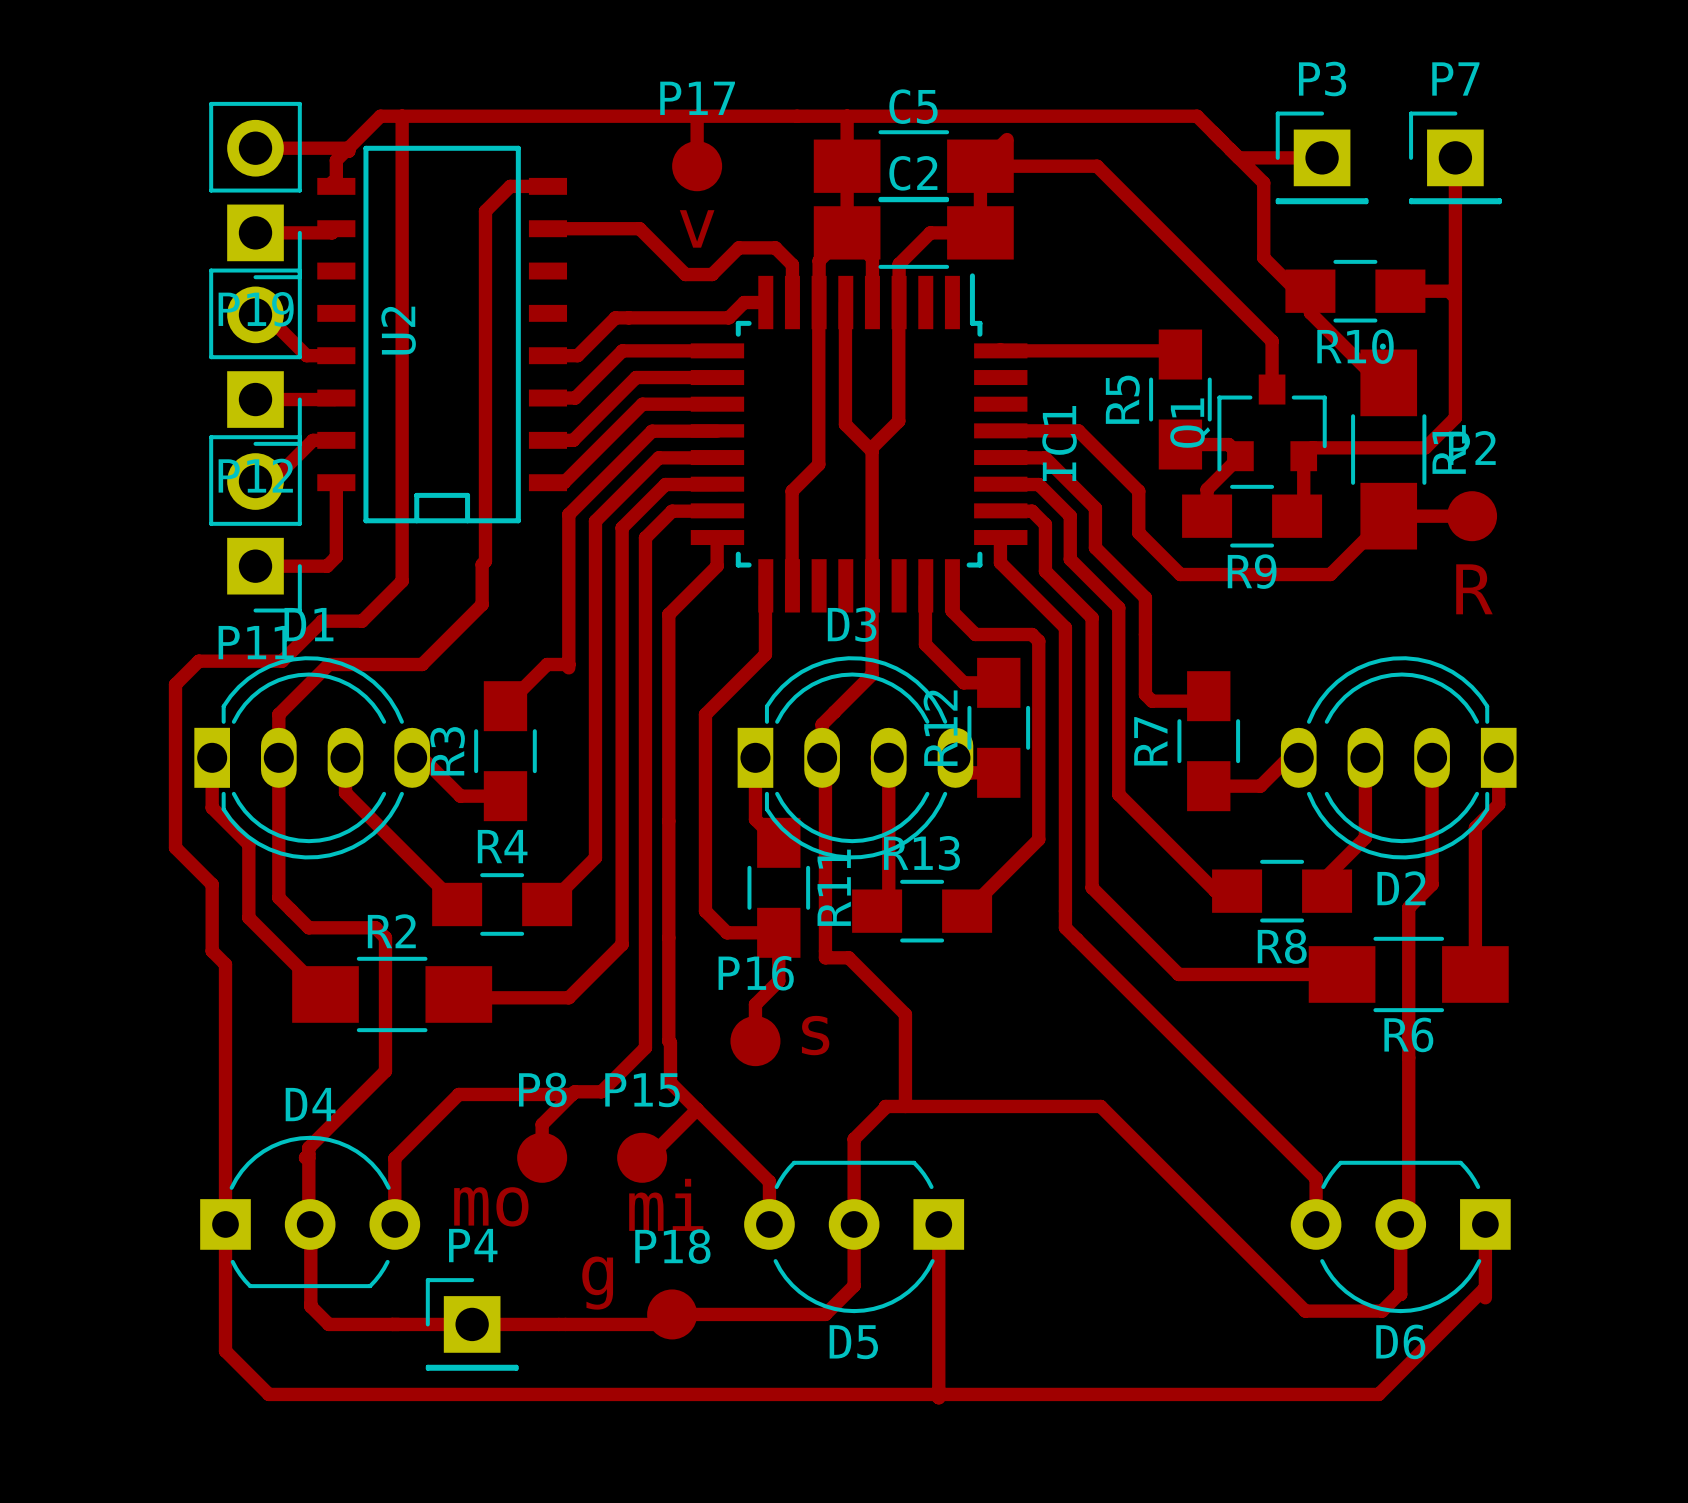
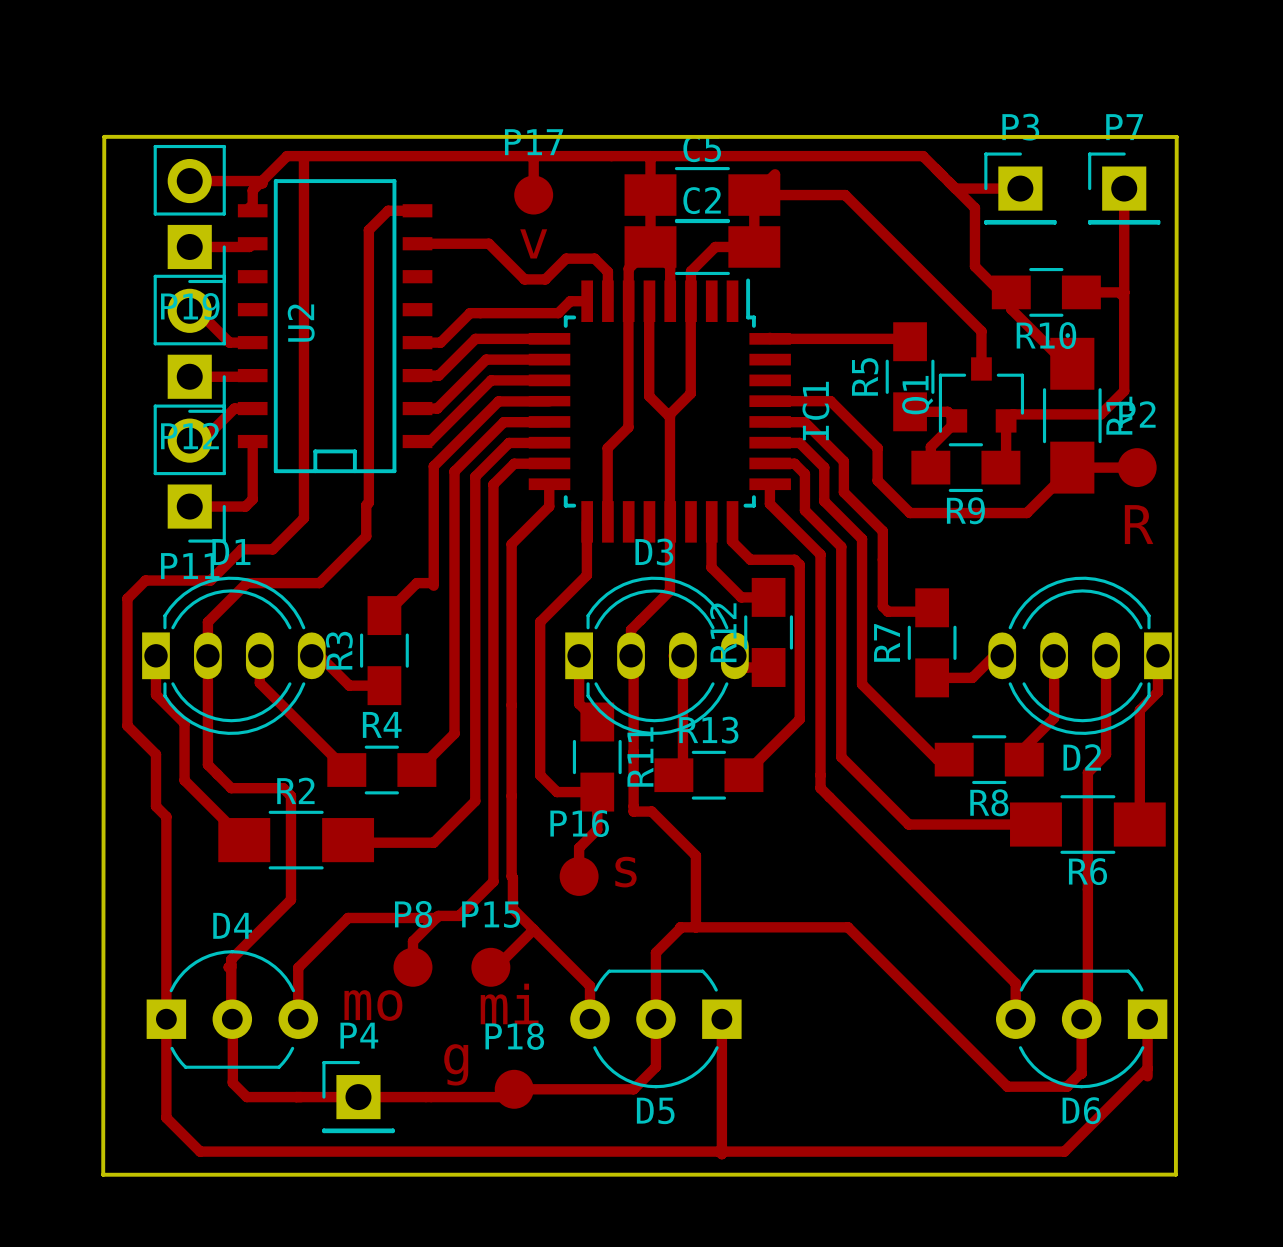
board edge: none -> (104, 136) (103, 1174) (1175, 1174) (1176, 136) (104, 136)

